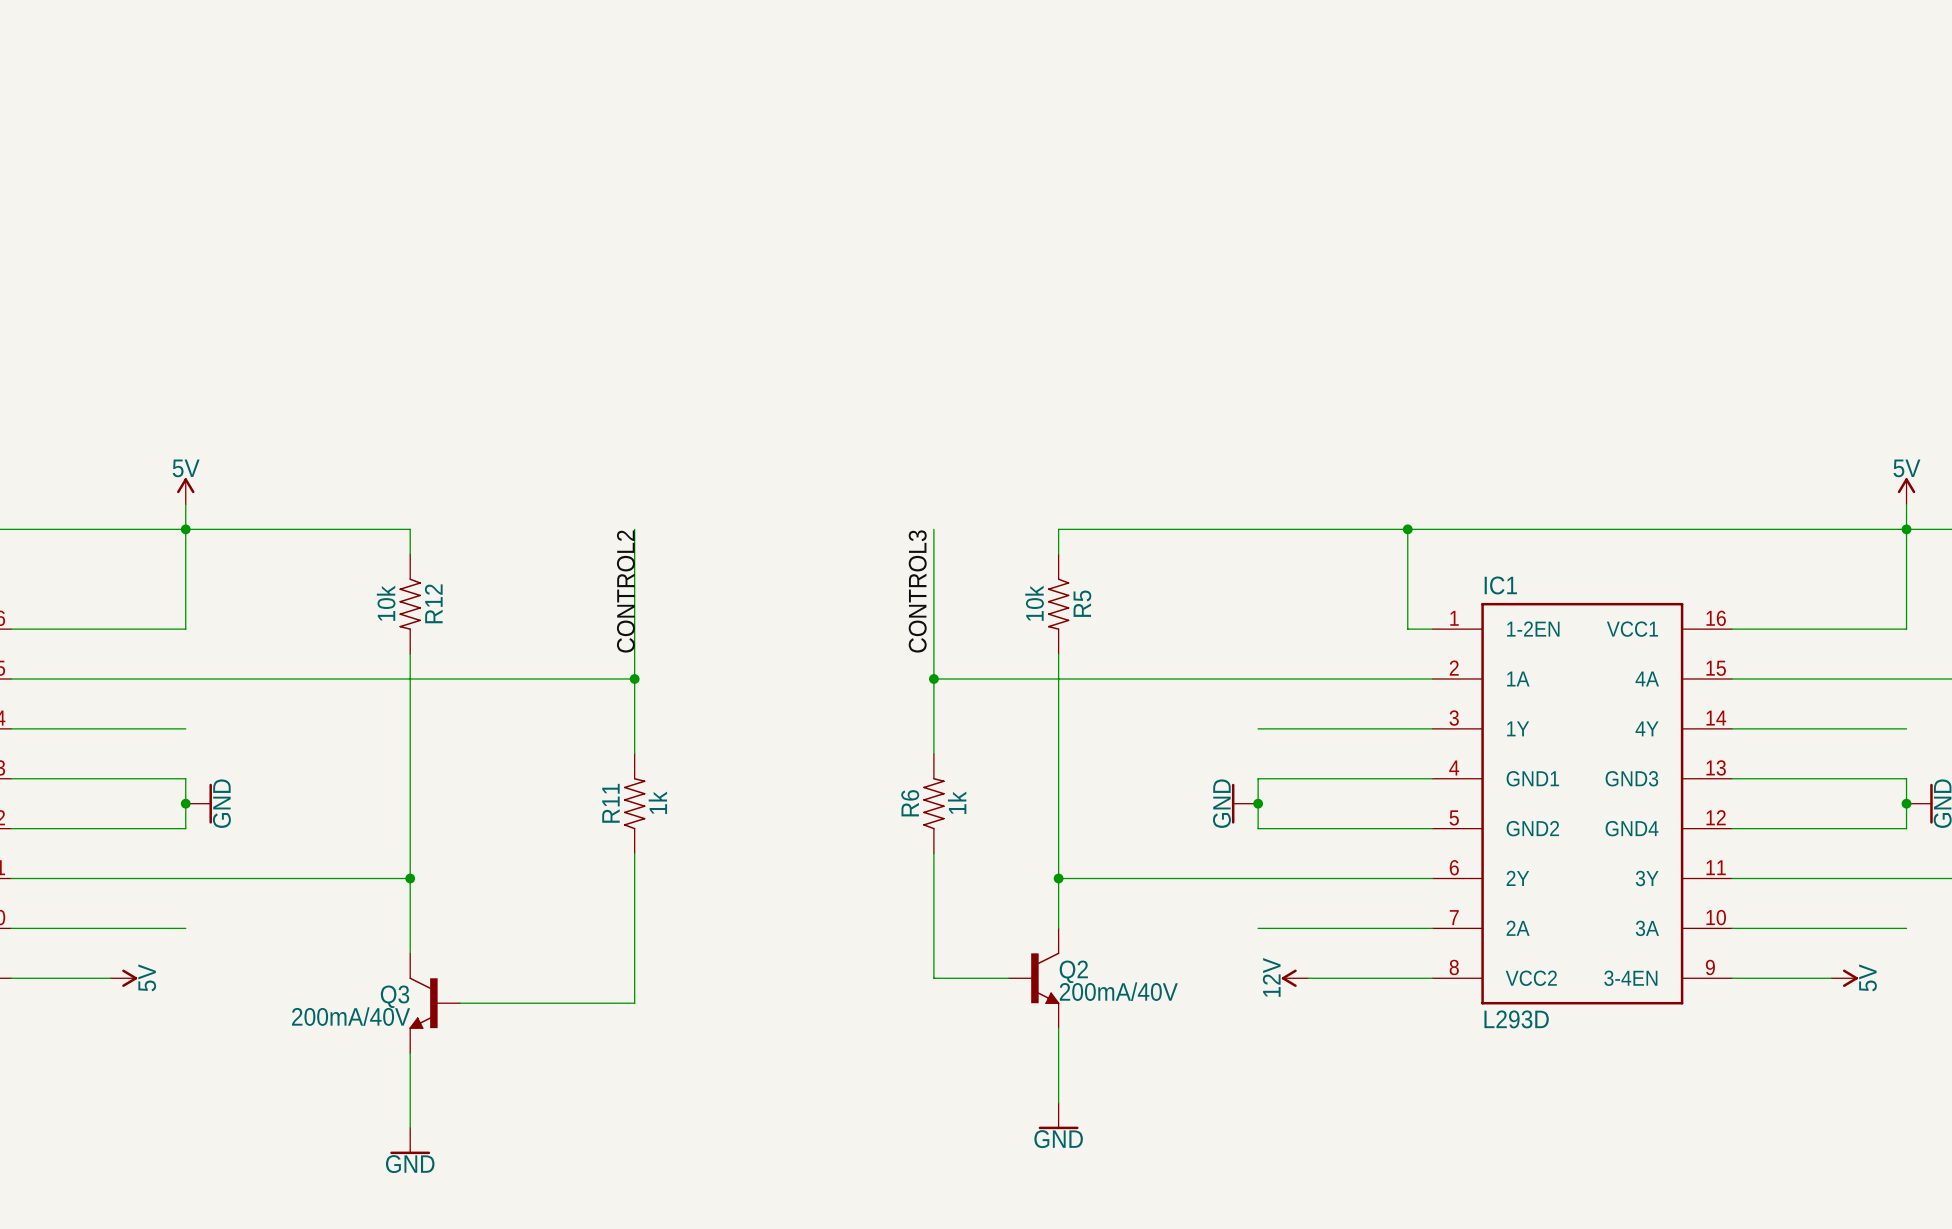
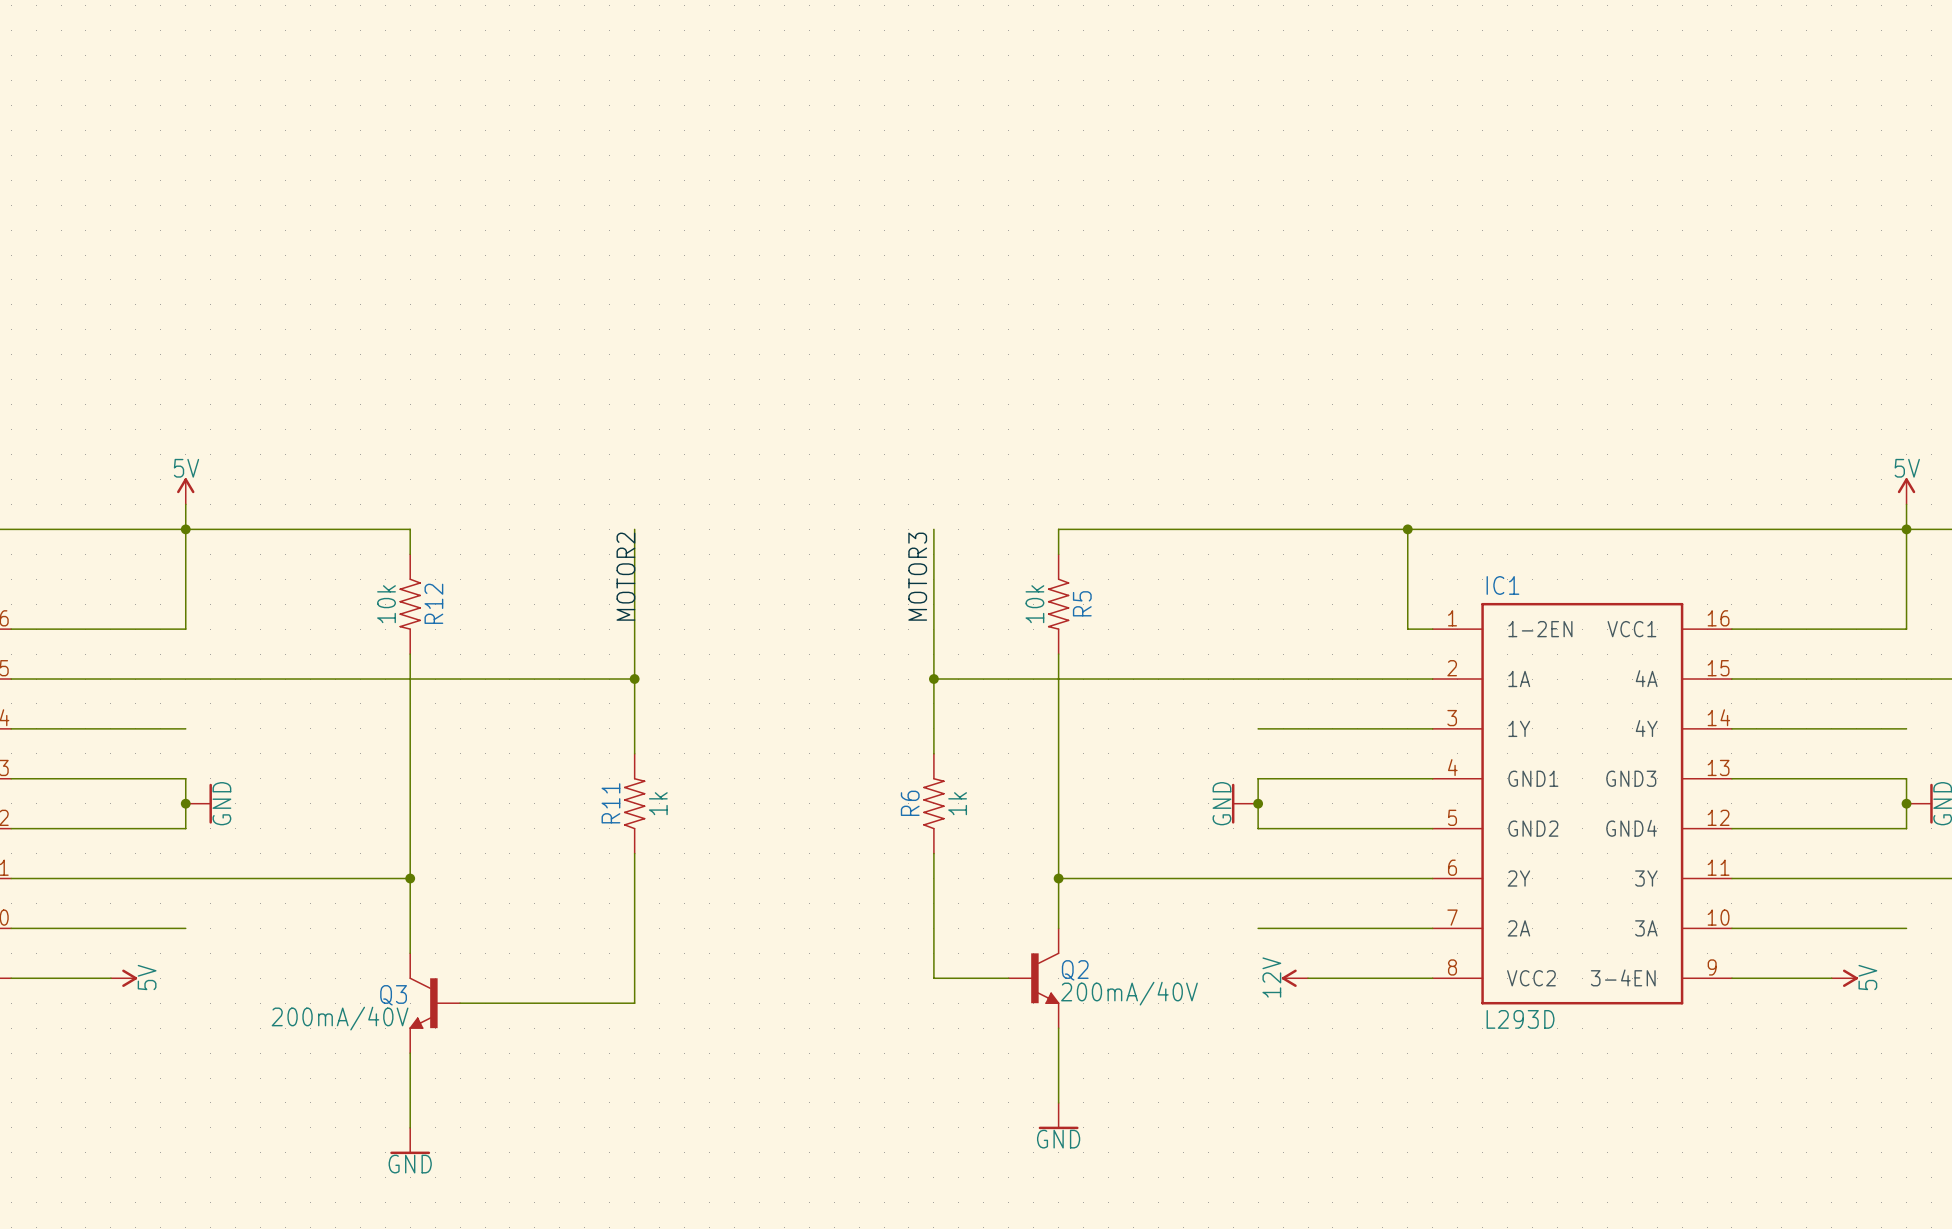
label: CONTROL2 (625, 591) -> MOTOR2 (625, 576)
label: CONTROL3 (917, 591) -> MOTOR3 (917, 576)

